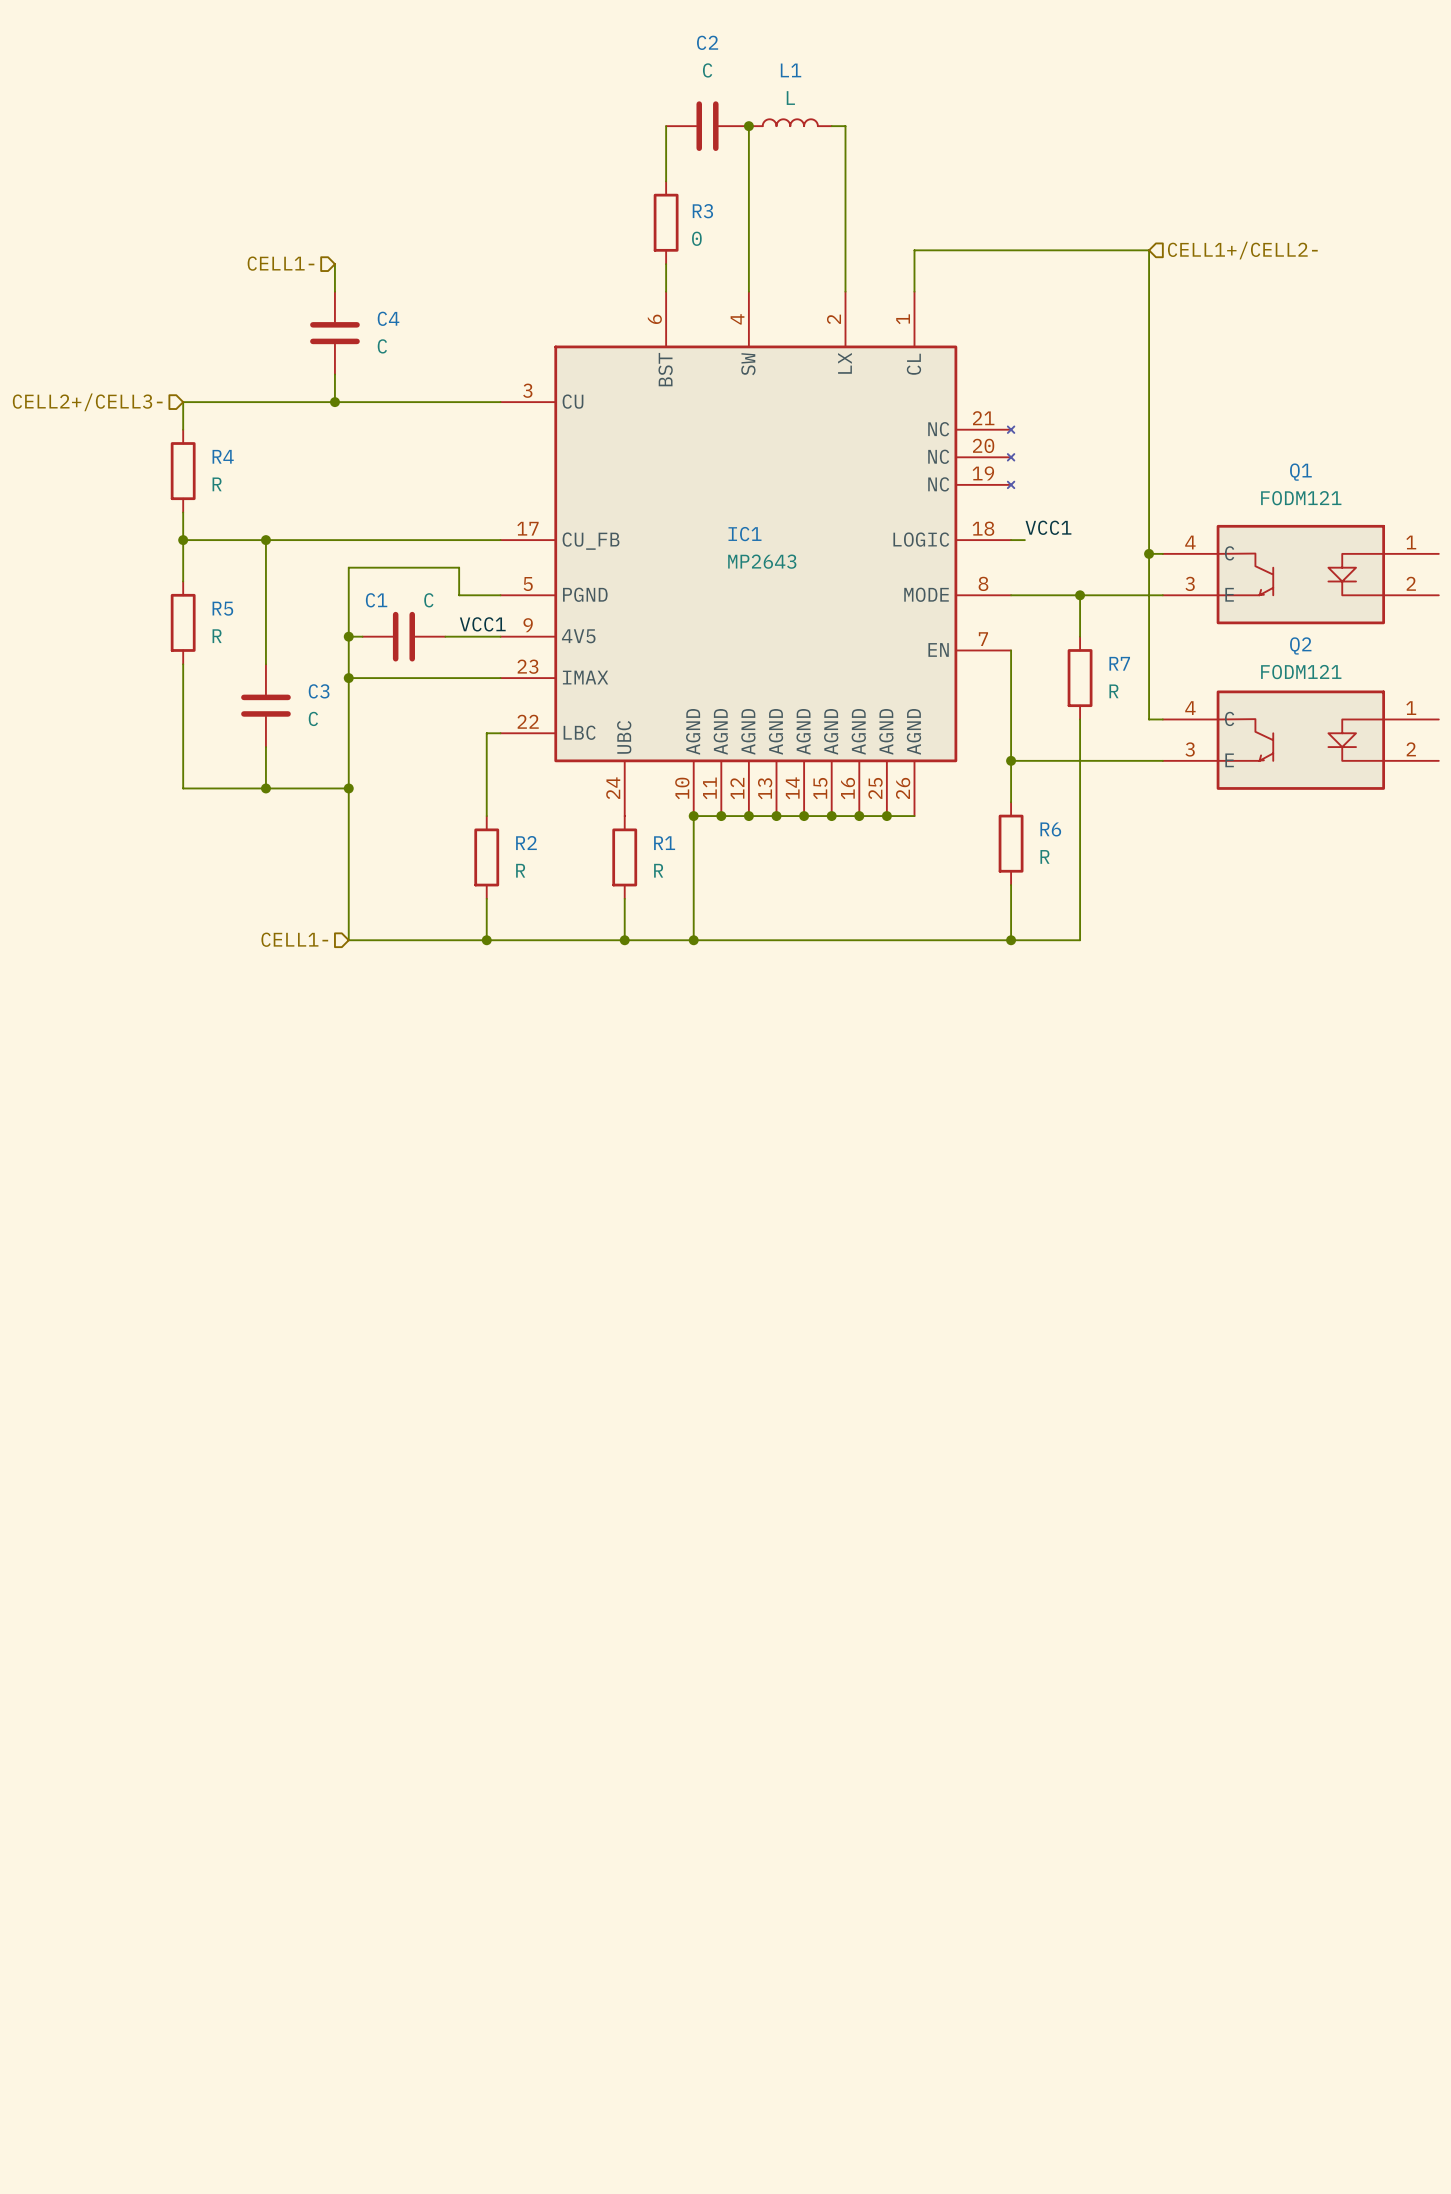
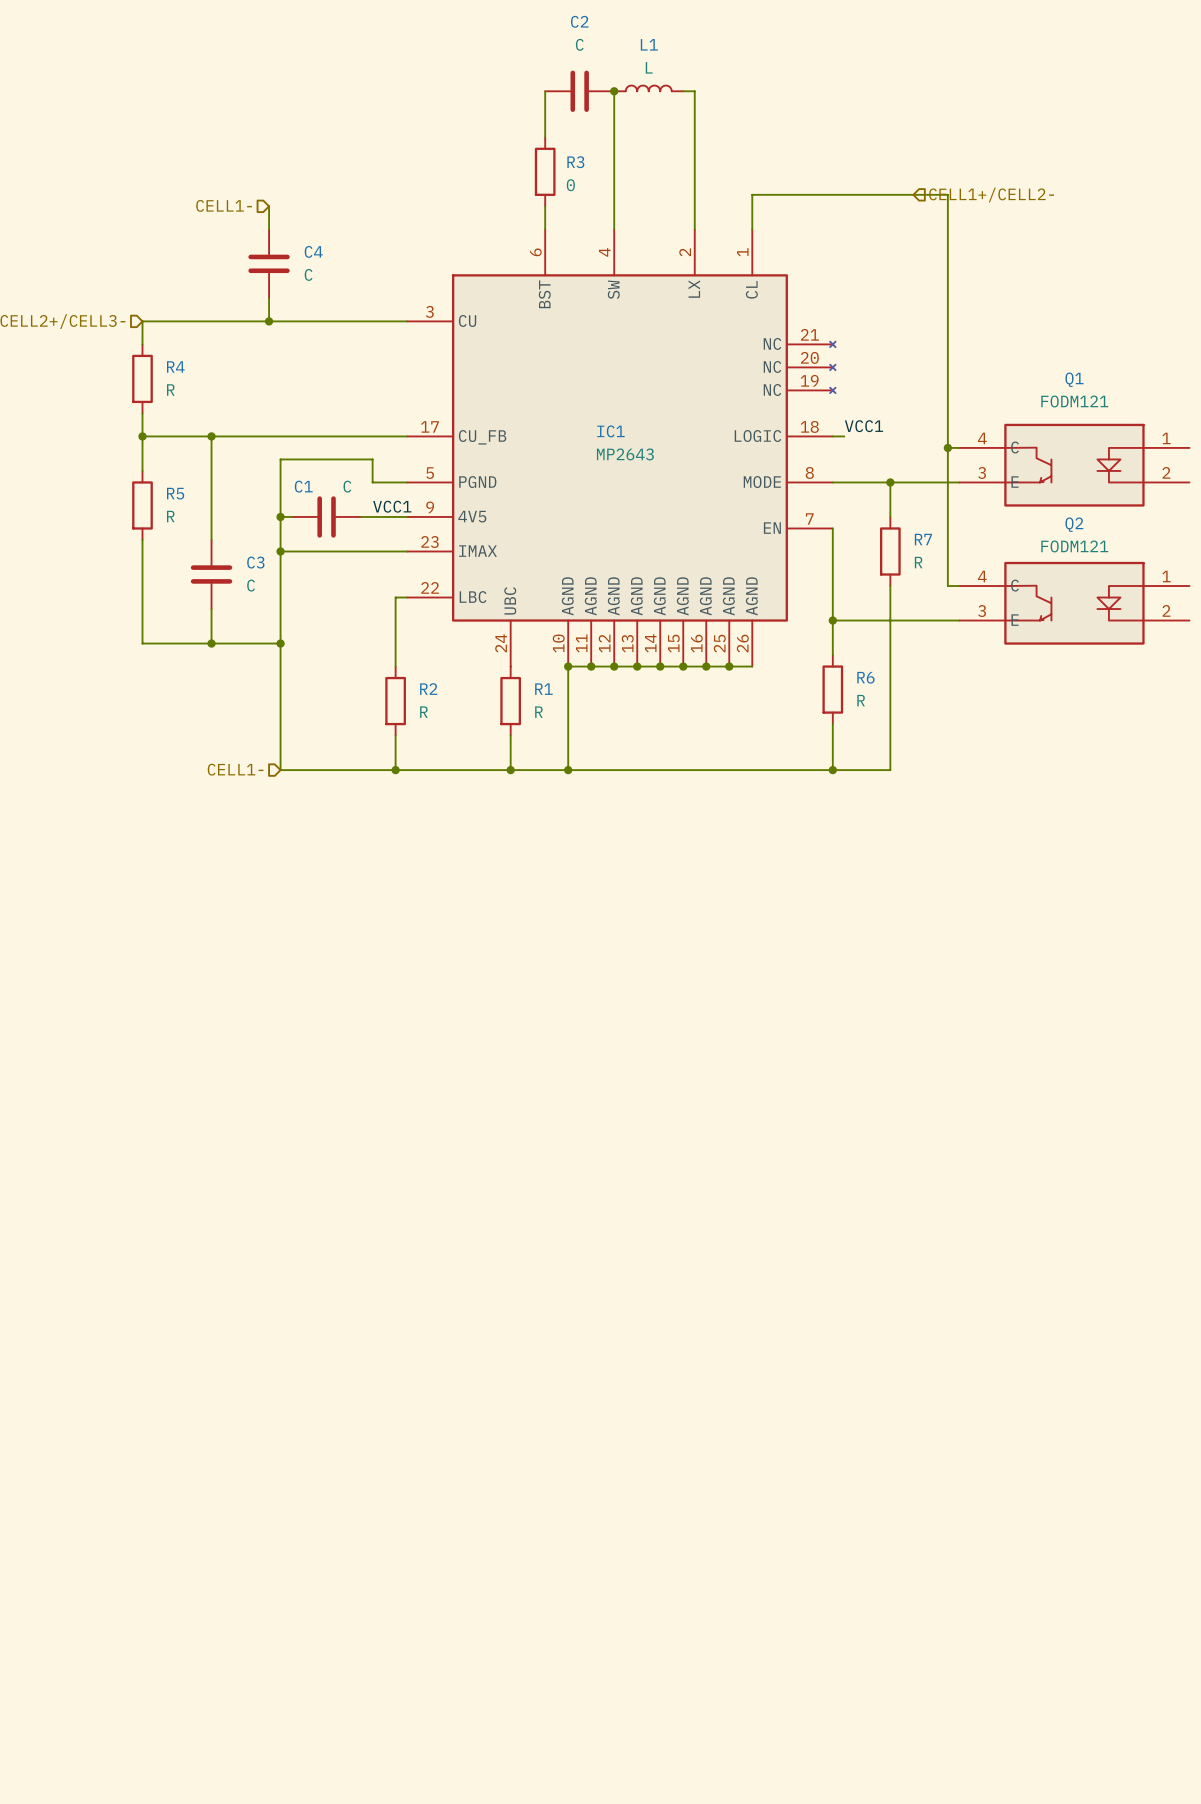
hierarchical label position: CELL1+/CELL2- (1242, 250) -> CELL1+/CELL2- (991, 195)

